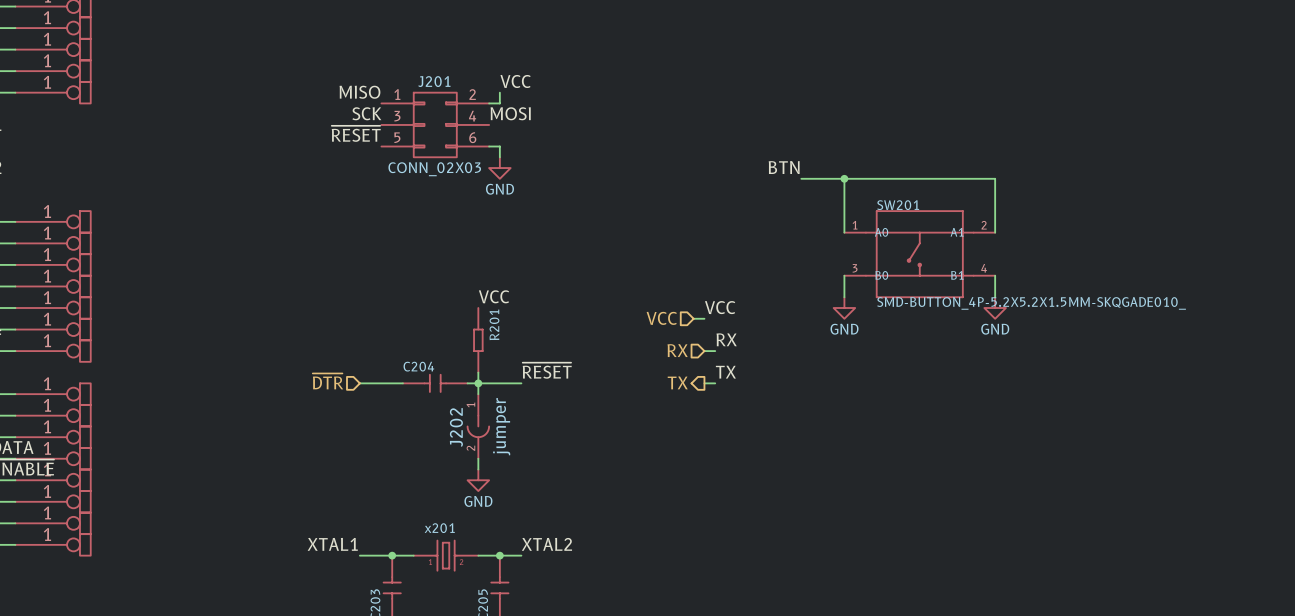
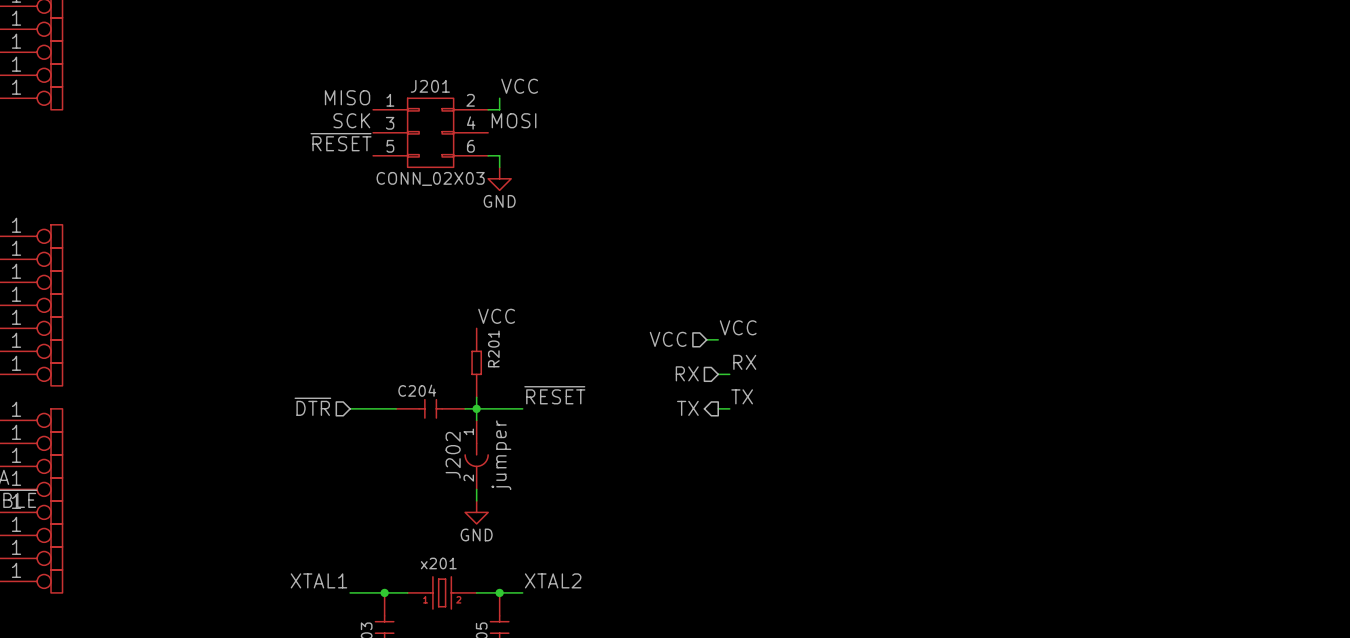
label: BTN (784, 167) -> none
wire: (801, 178) (995, 178) (995, 232) -> none
wire: (844, 178) (844, 232) -> none
junction: (844, 178) -> none
SW201: SMD-BUTTON_4P-5.2X5.2X1.5MM-SKQGADE010_ (919, 254) -> none
wire: (844, 275) (844, 297) -> none
wire: (995, 275) (995, 297) -> none
power symbol: GND (844, 308) -> none
power symbol: GND (995, 308) -> none

